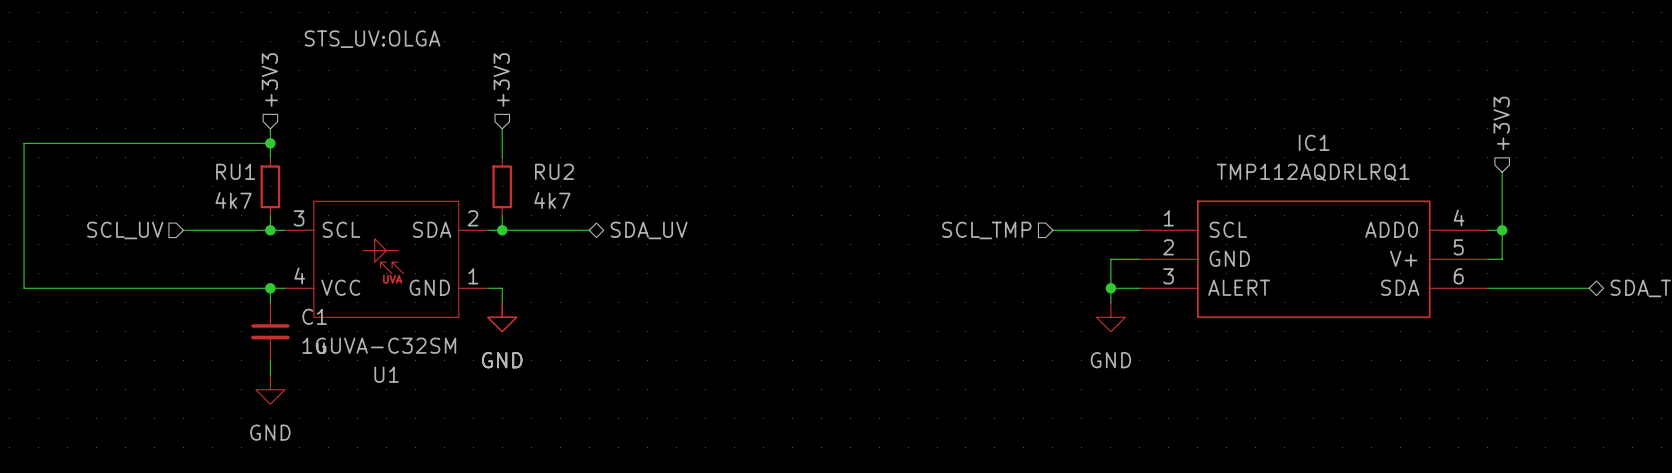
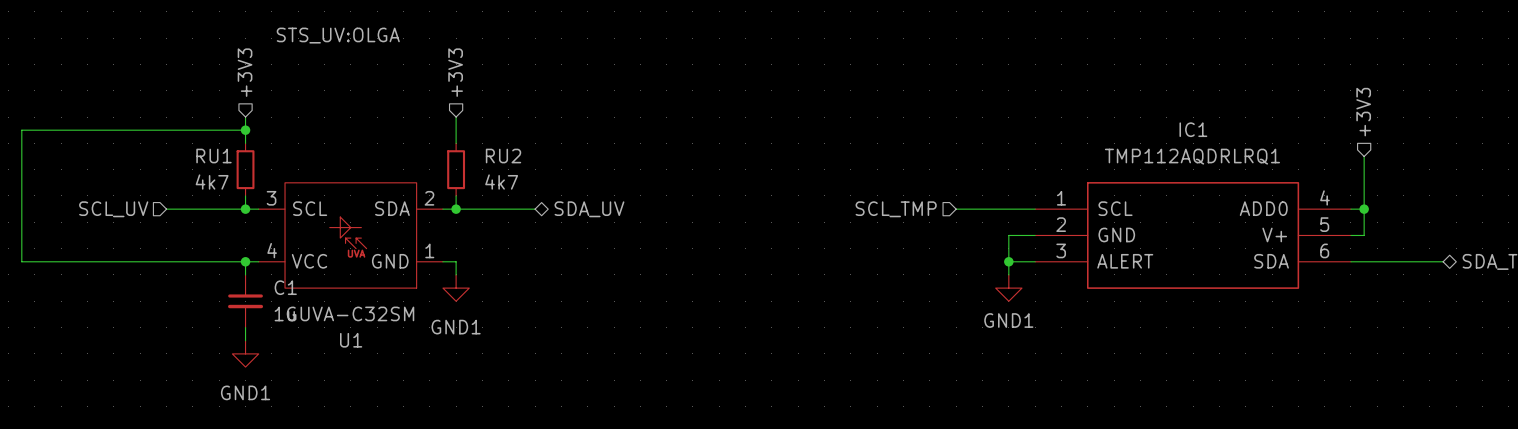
power symbol: GND (502, 317) -> GND1 (456, 288)
power symbol: GND (1110, 317) -> GND1 (1008, 288)
power symbol: GND (270, 389) -> GND1 (245, 353)

